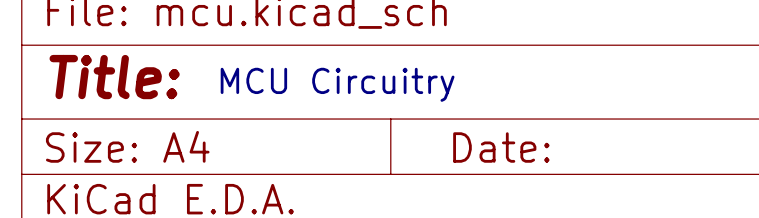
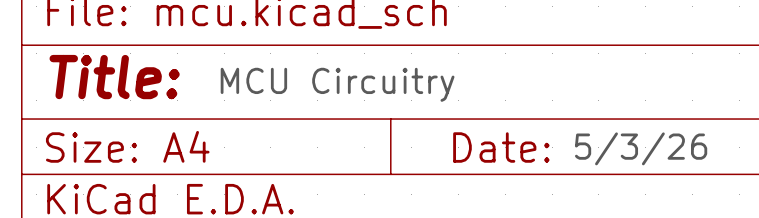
text: none -> 5/3/26 (641, 148)

